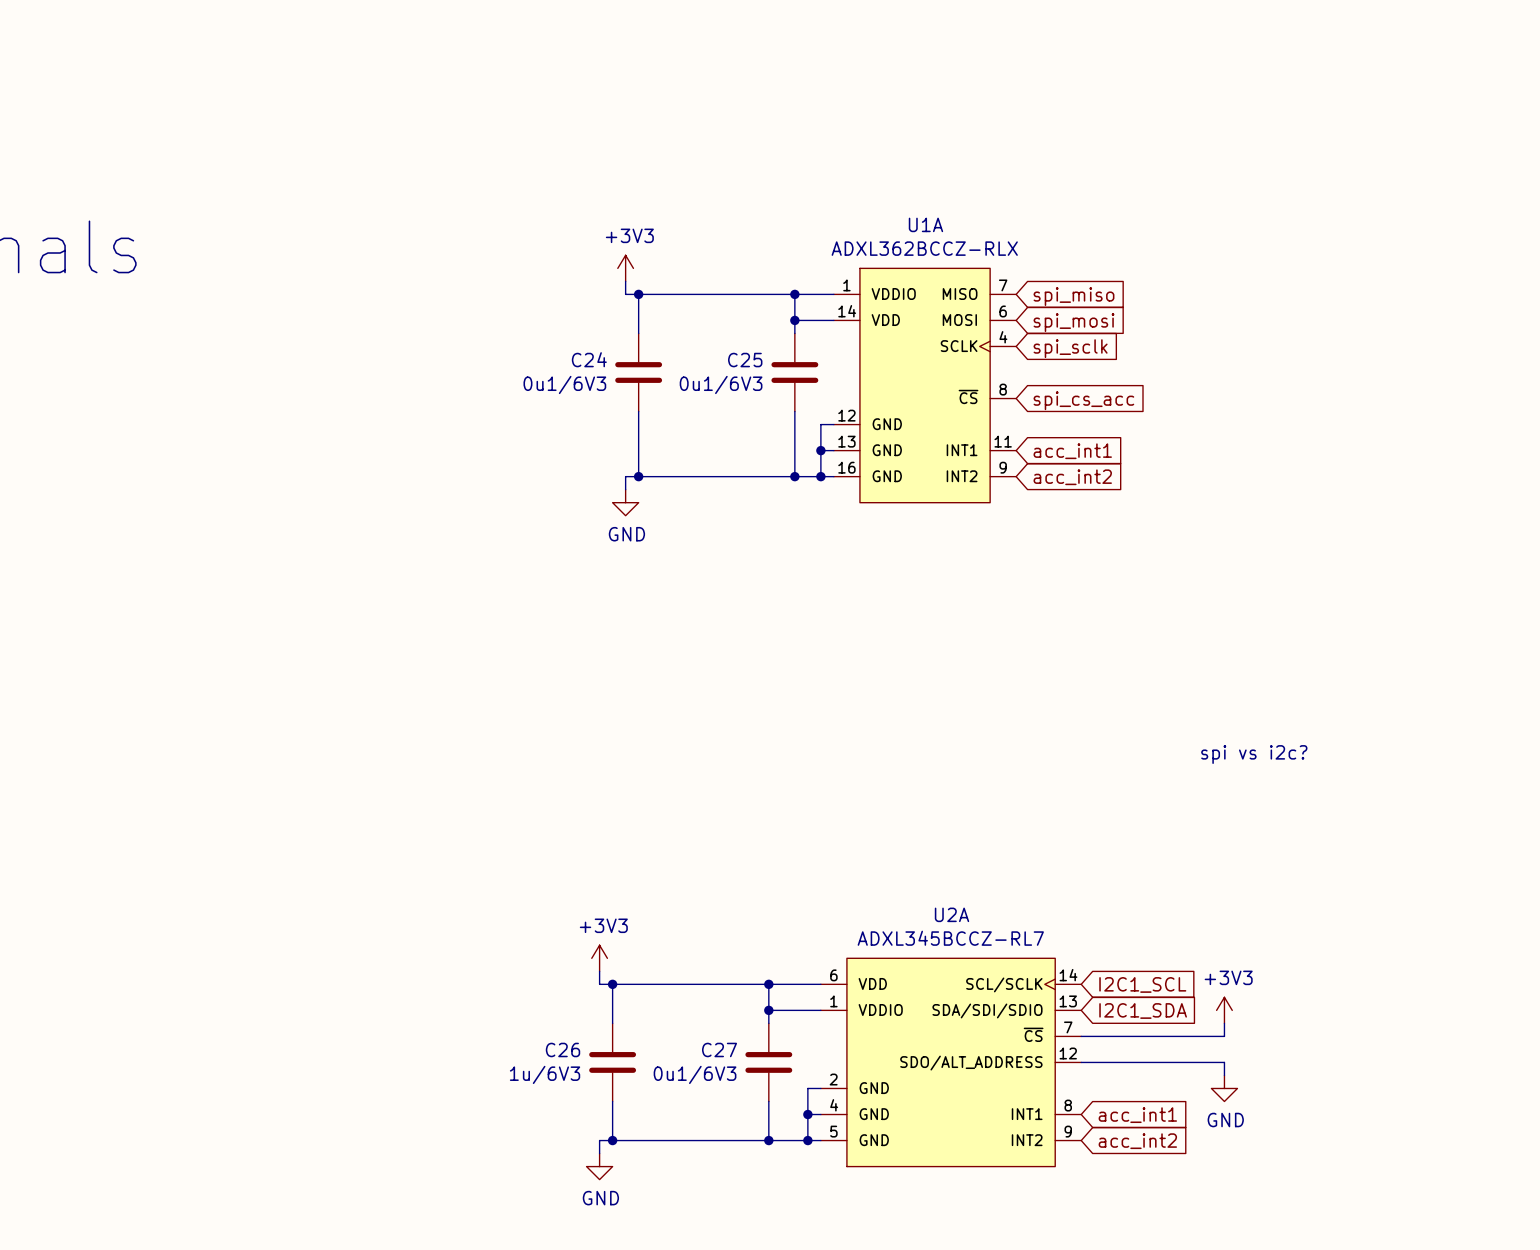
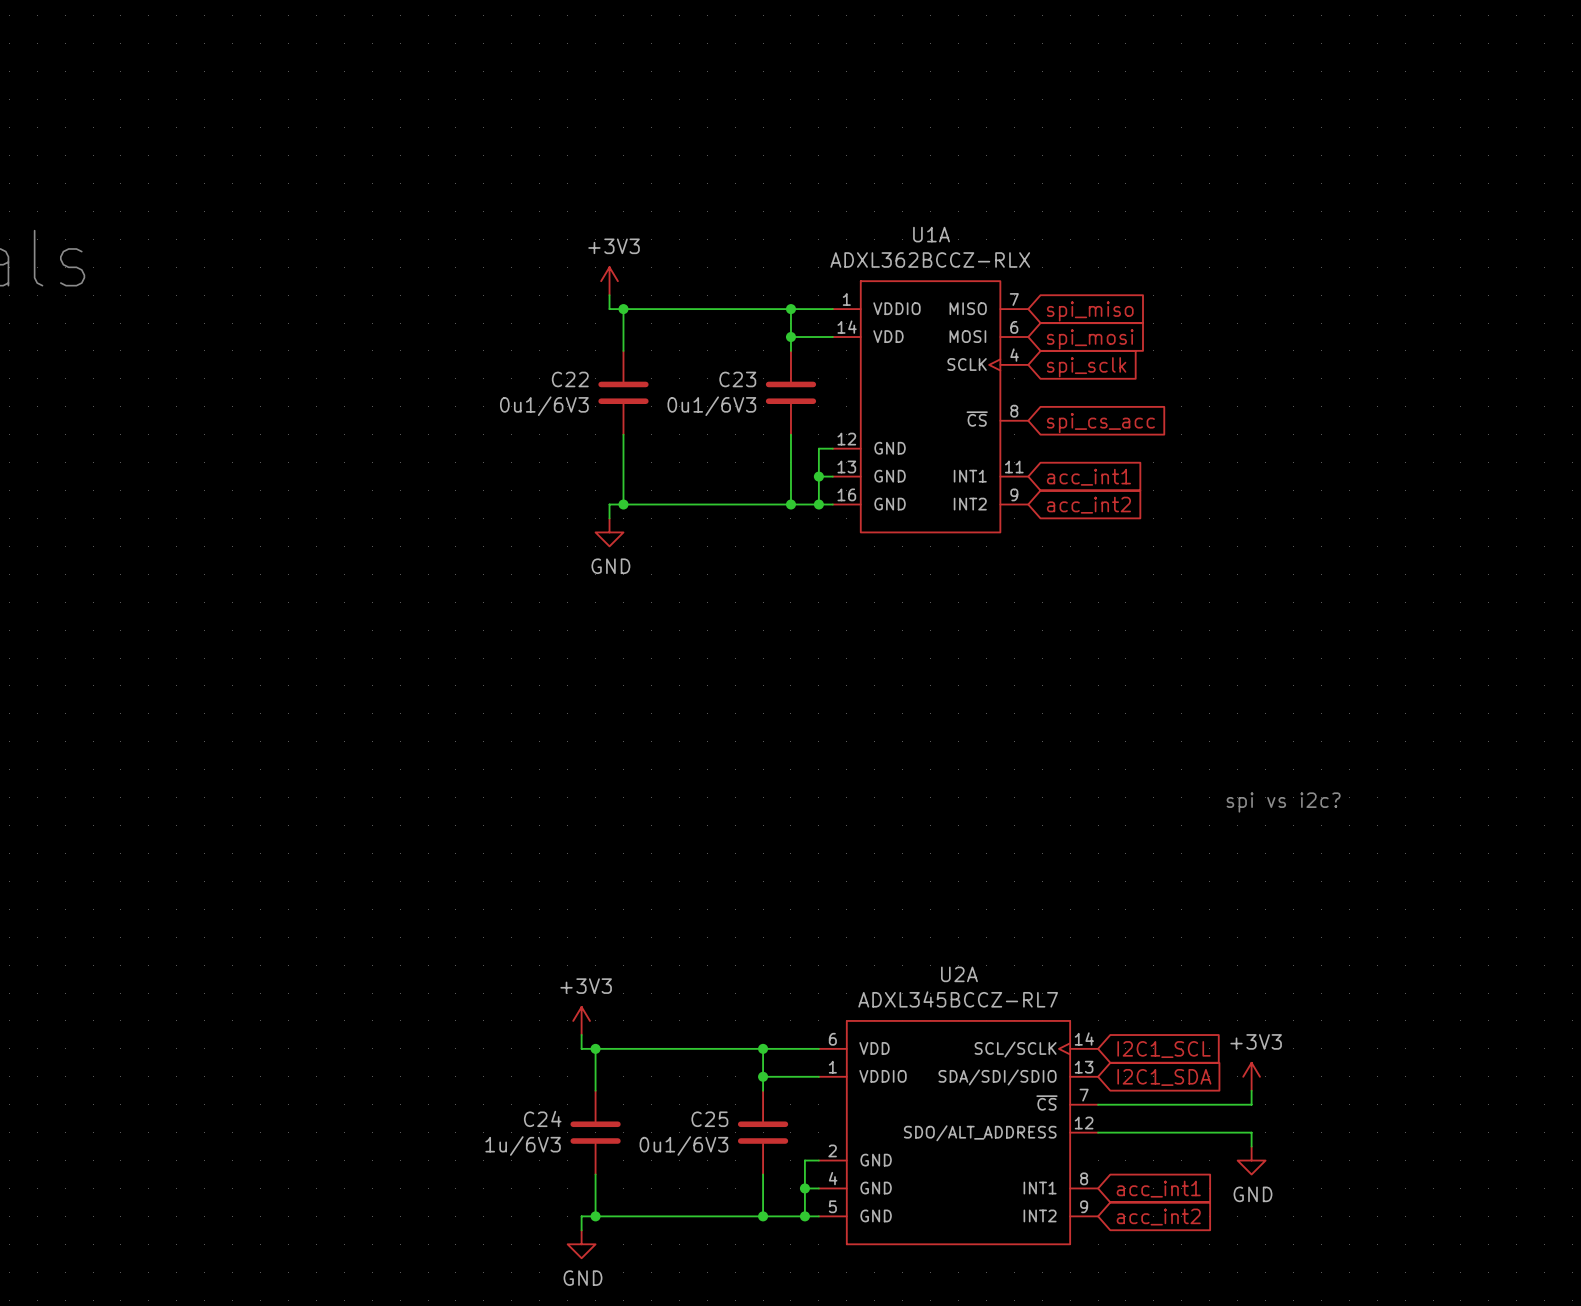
C24 name: C24 (589, 359) -> C22 (570, 379)
C25 name: C25 (745, 360) -> C23 (737, 379)
C26 name: C26 (563, 1049) -> C24 (542, 1118)
C27 name: C27 (719, 1049) -> C25 (709, 1119)

